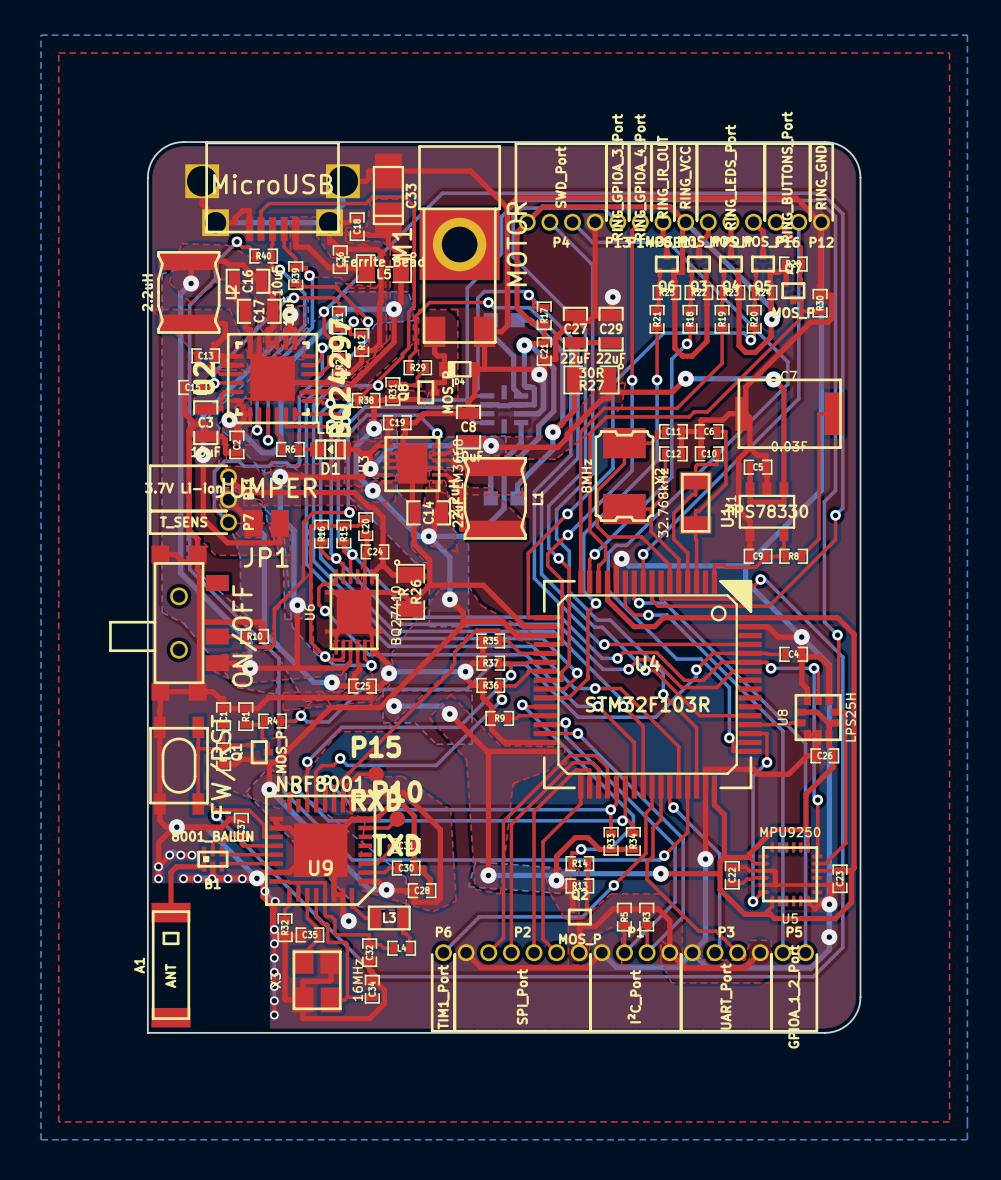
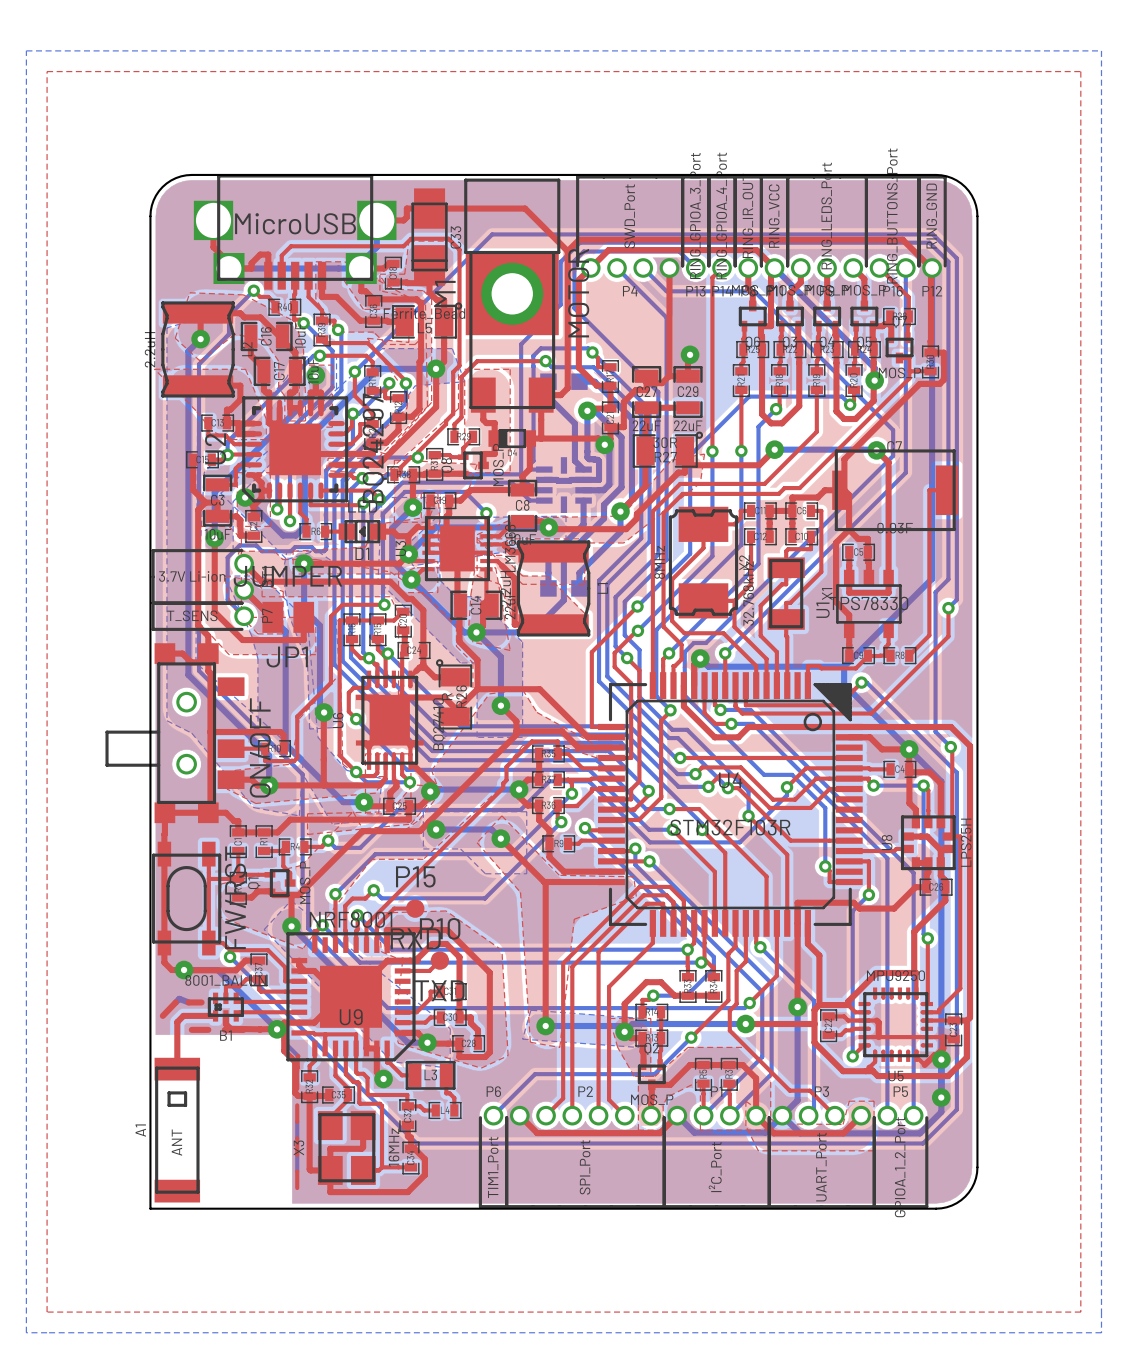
top track: (174, 827) (158, 842) (158, 878) -> none
via: (169, 855) -> none
via: (180, 855) -> none
via: (191, 855) -> none
via: (158, 866) -> none
via: (158, 878) -> none
via: (183, 878) -> none
via: (197, 878) -> none
via: (211, 878) -> none
via: (228, 878) -> none
via: (242, 878) -> none
via: (264, 891) -> none
via: (275, 901) -> none
via: (274, 929) -> none
via: (274, 943) -> none
via: (274, 958) -> none
via: (274, 972) -> none
via: (274, 986) -> none
via: (274, 1000) -> none
via: (274, 1015) -> none

